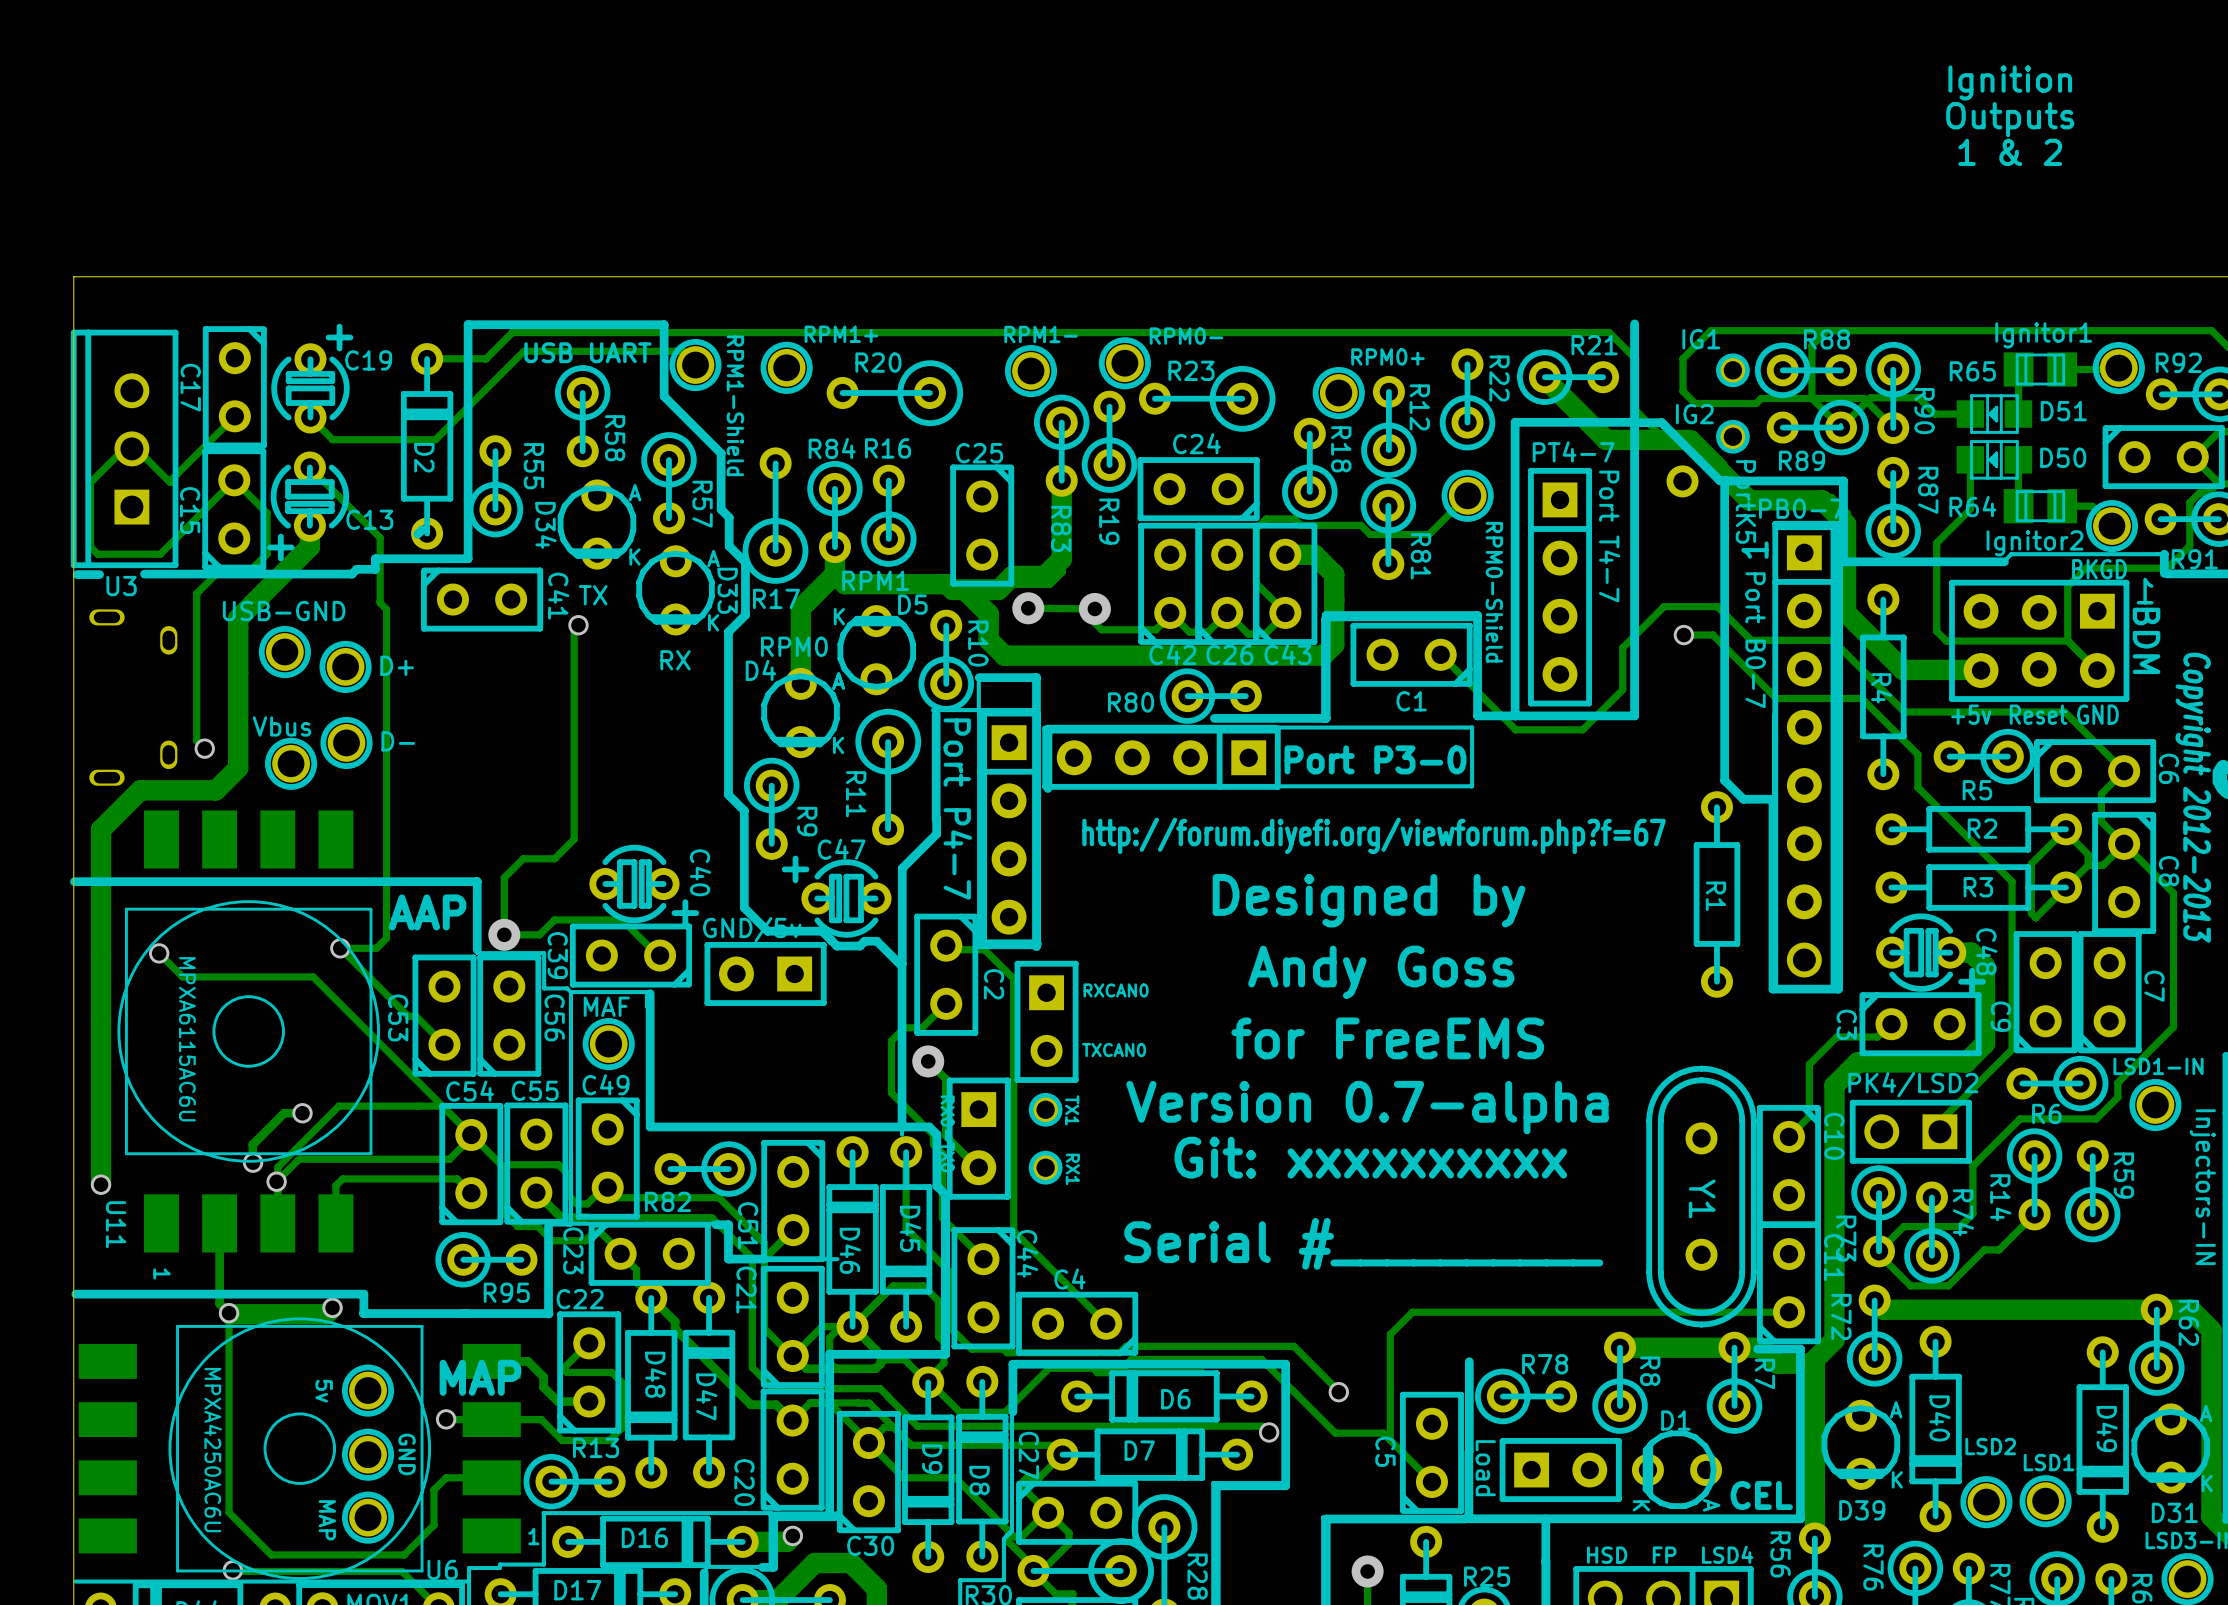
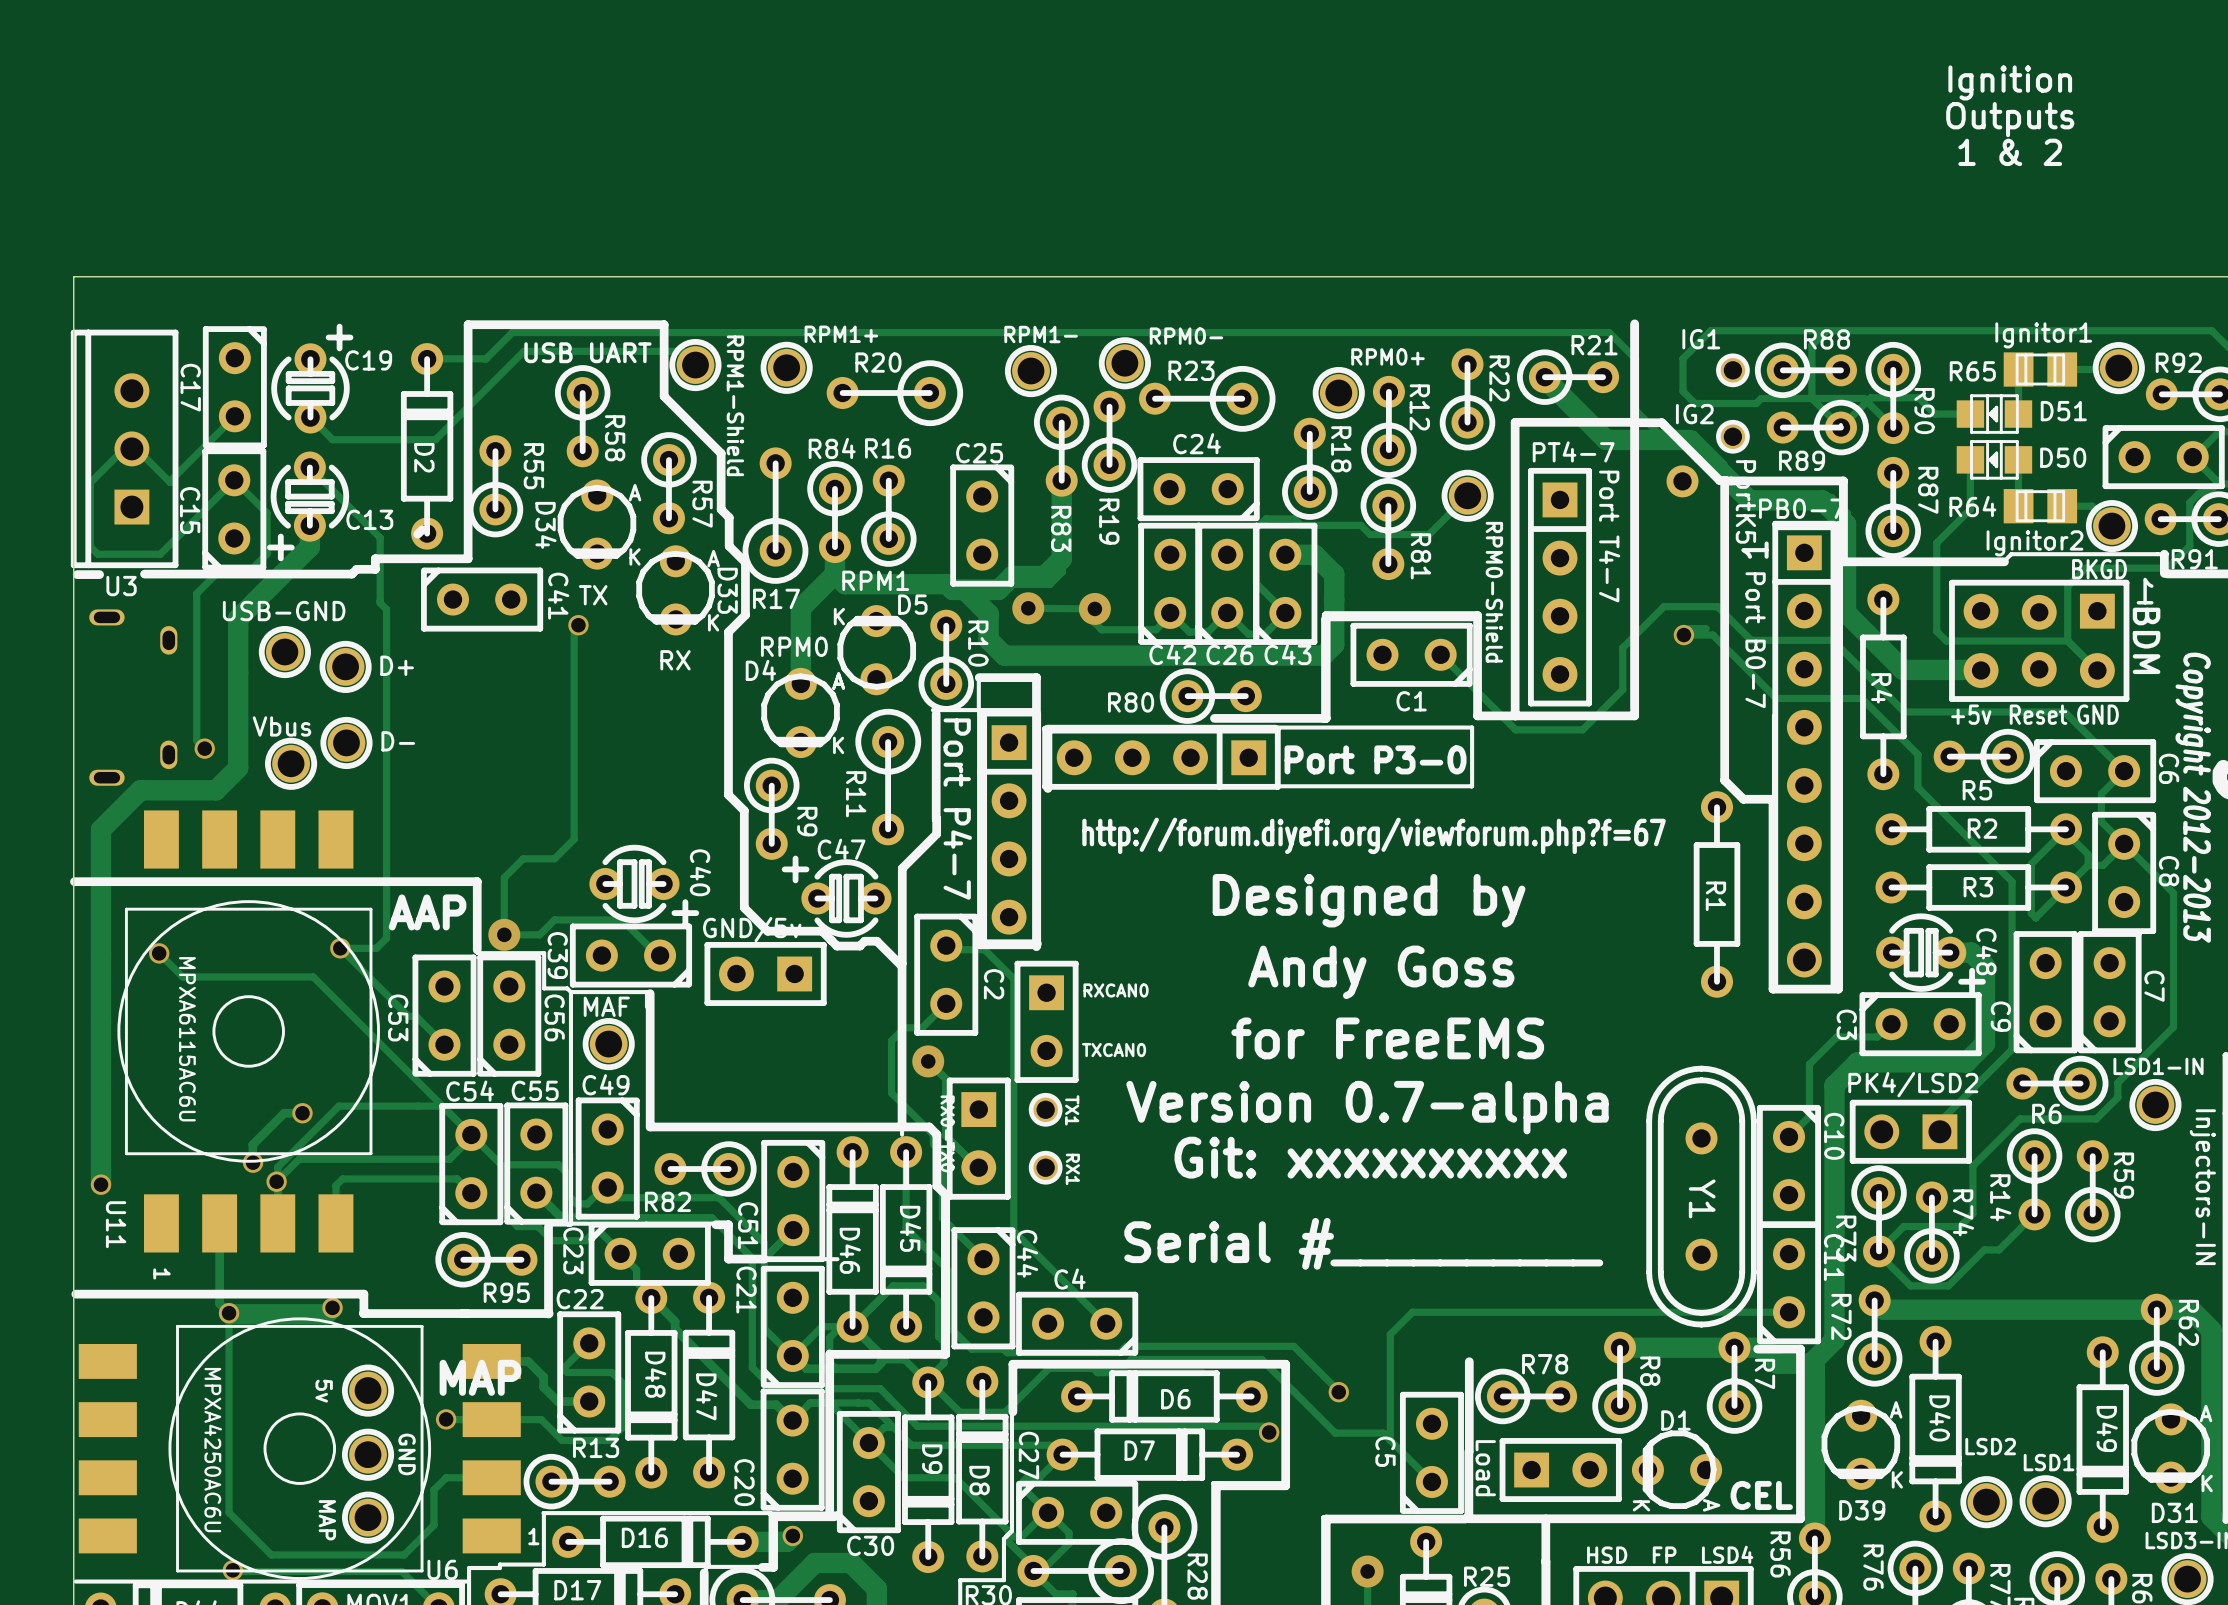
track: none -> (1706, 628) (1690, 628) (1683, 635)

